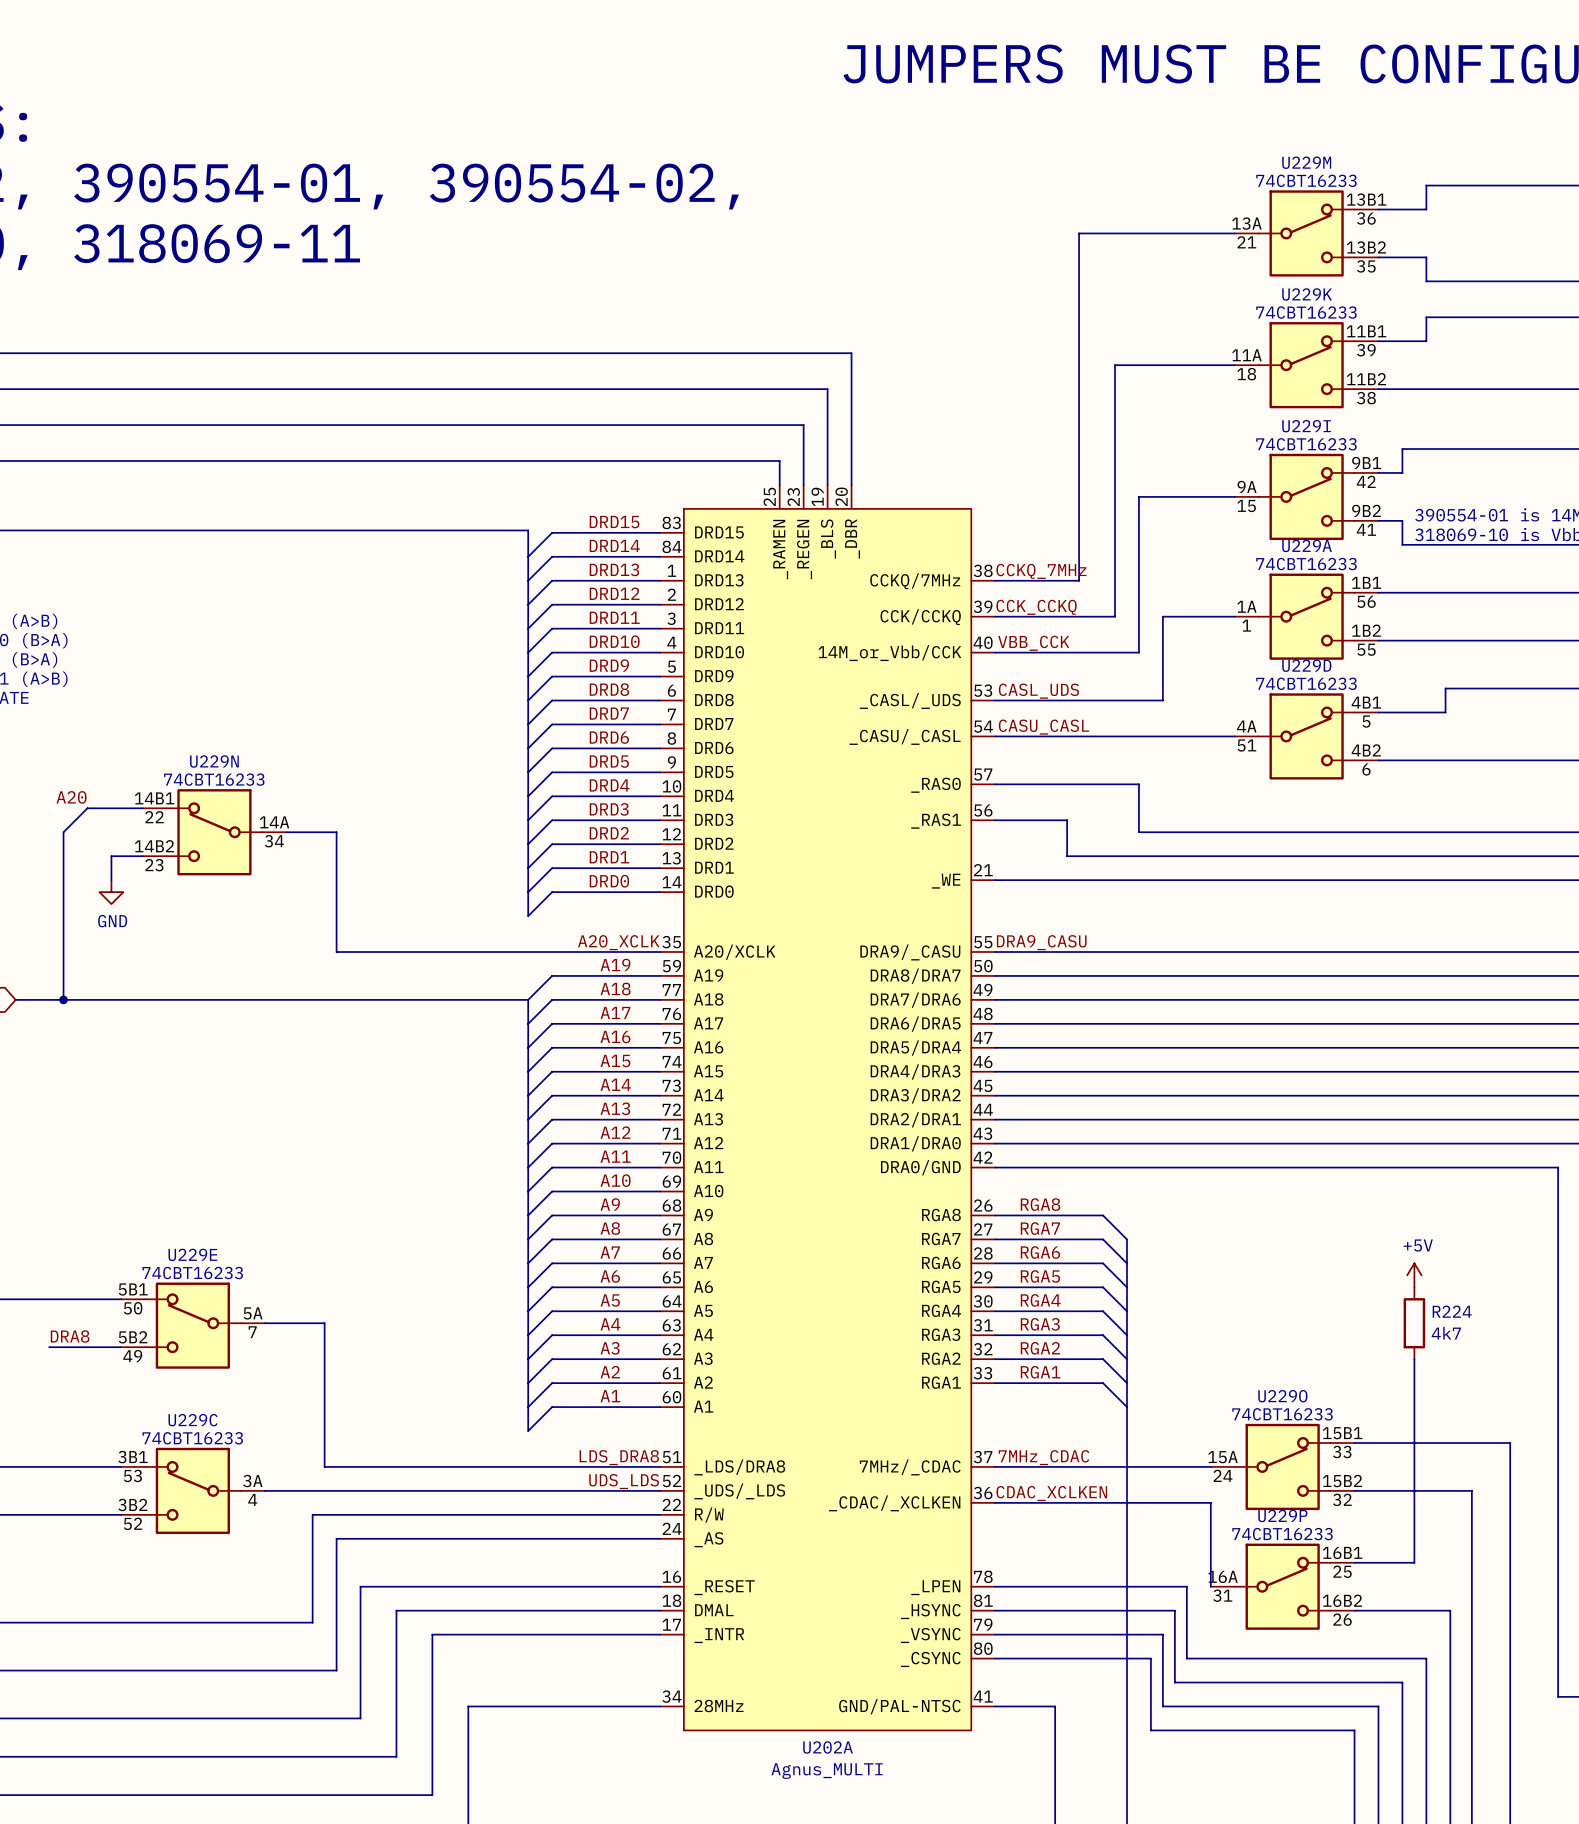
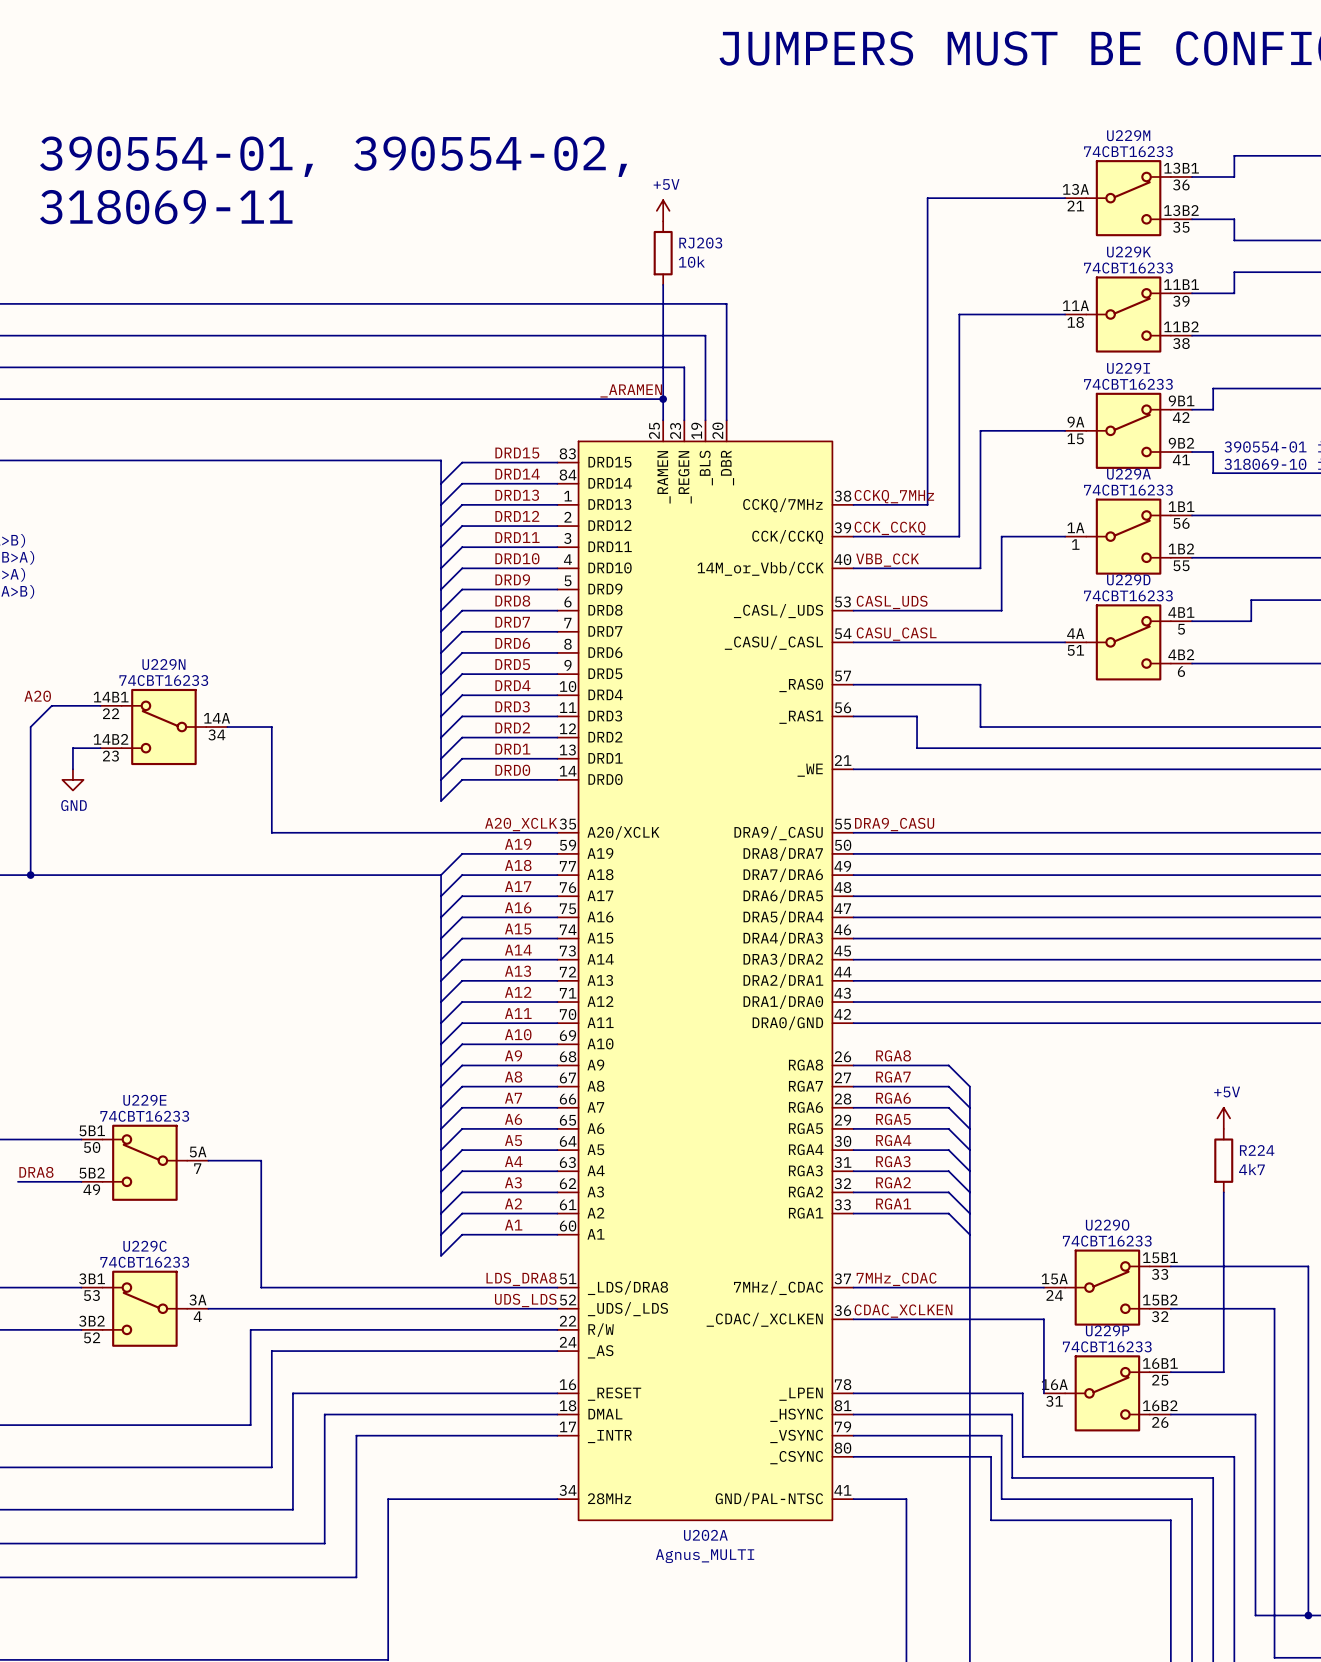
power symbol: none -> +5V (663, 210)
RJ203: none -> 10k (663, 253)
wire: none -> (663, 284) (663, 399)
label: none -> _ARAMEN (631, 390)
junction: none -> (663, 399)

